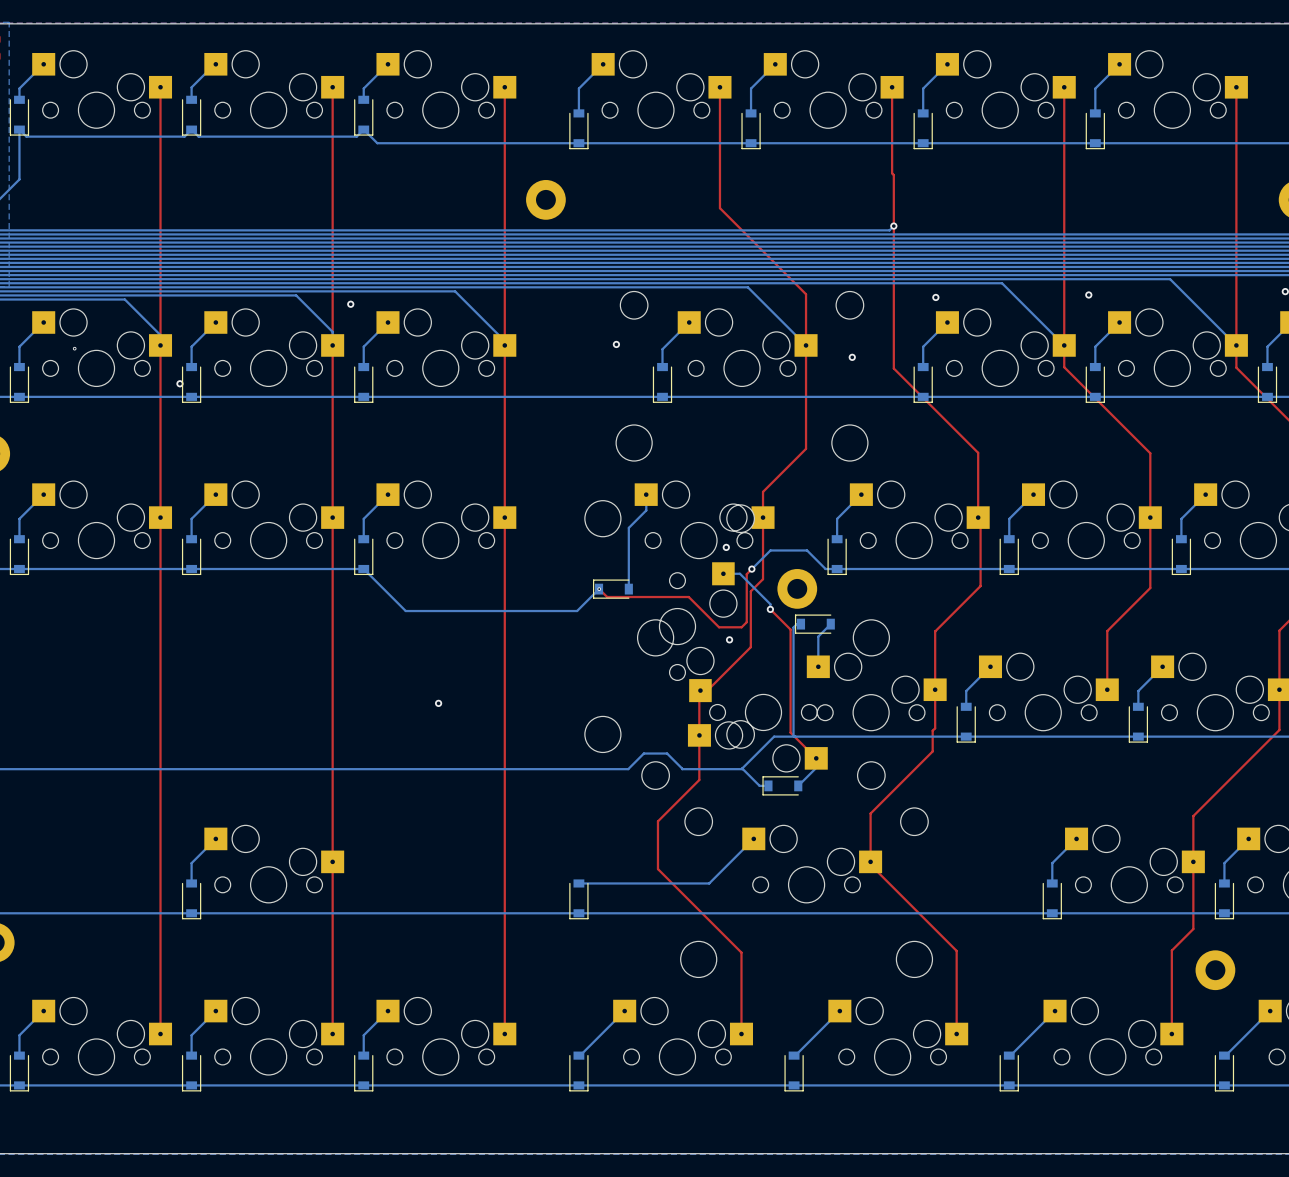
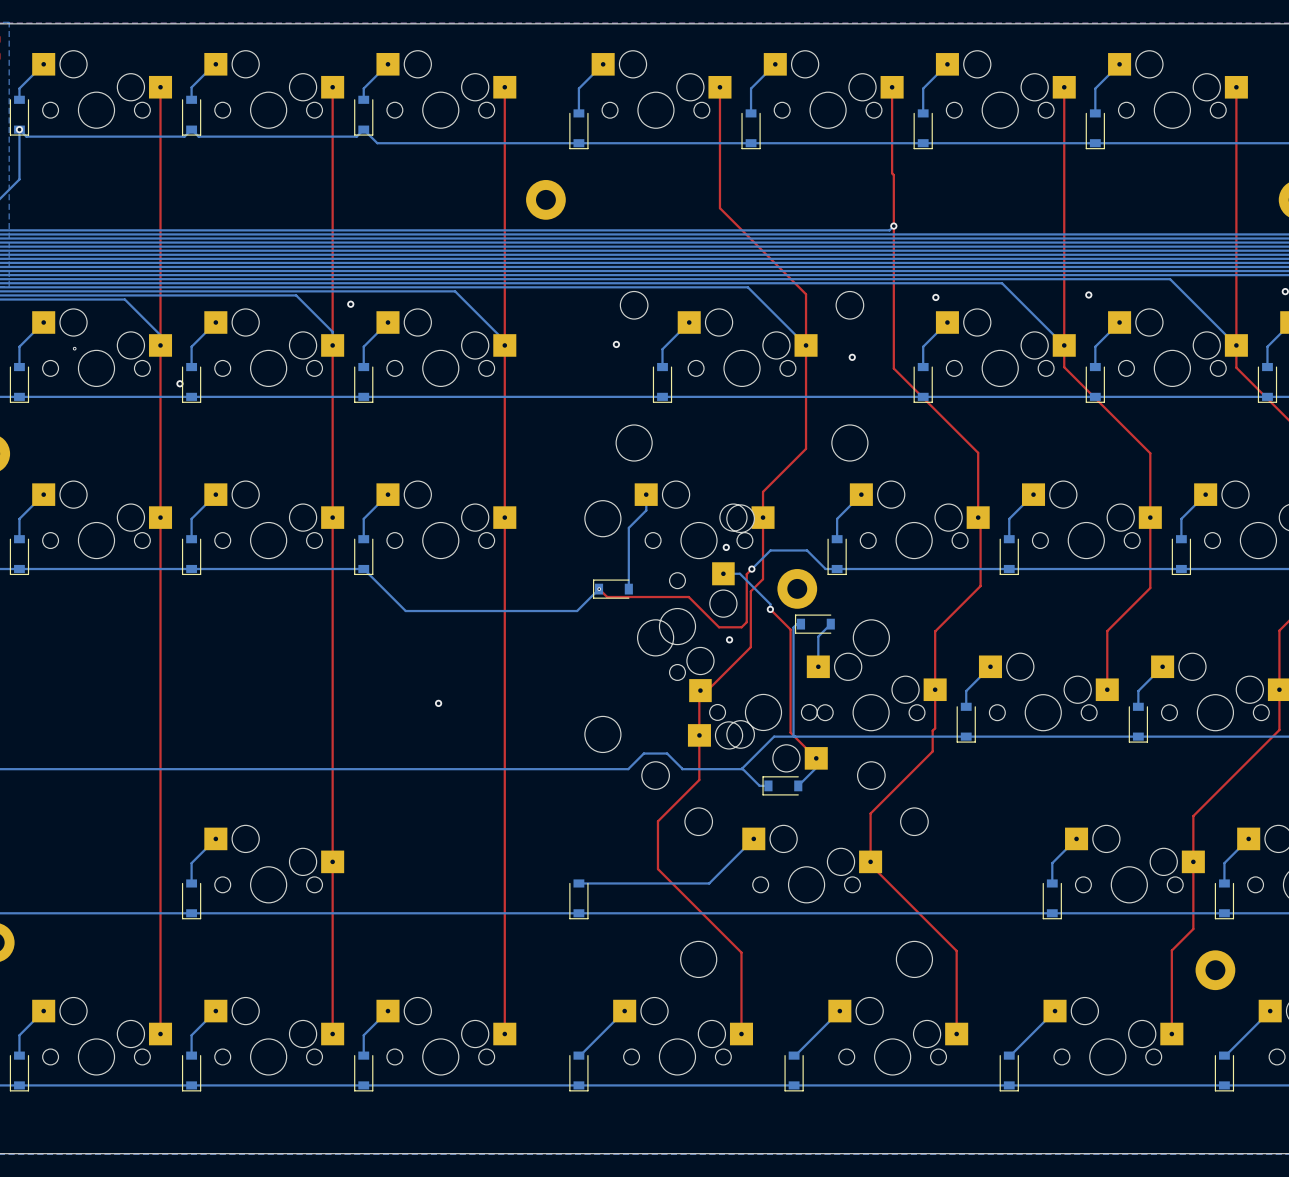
via: none -> (19, 129)

